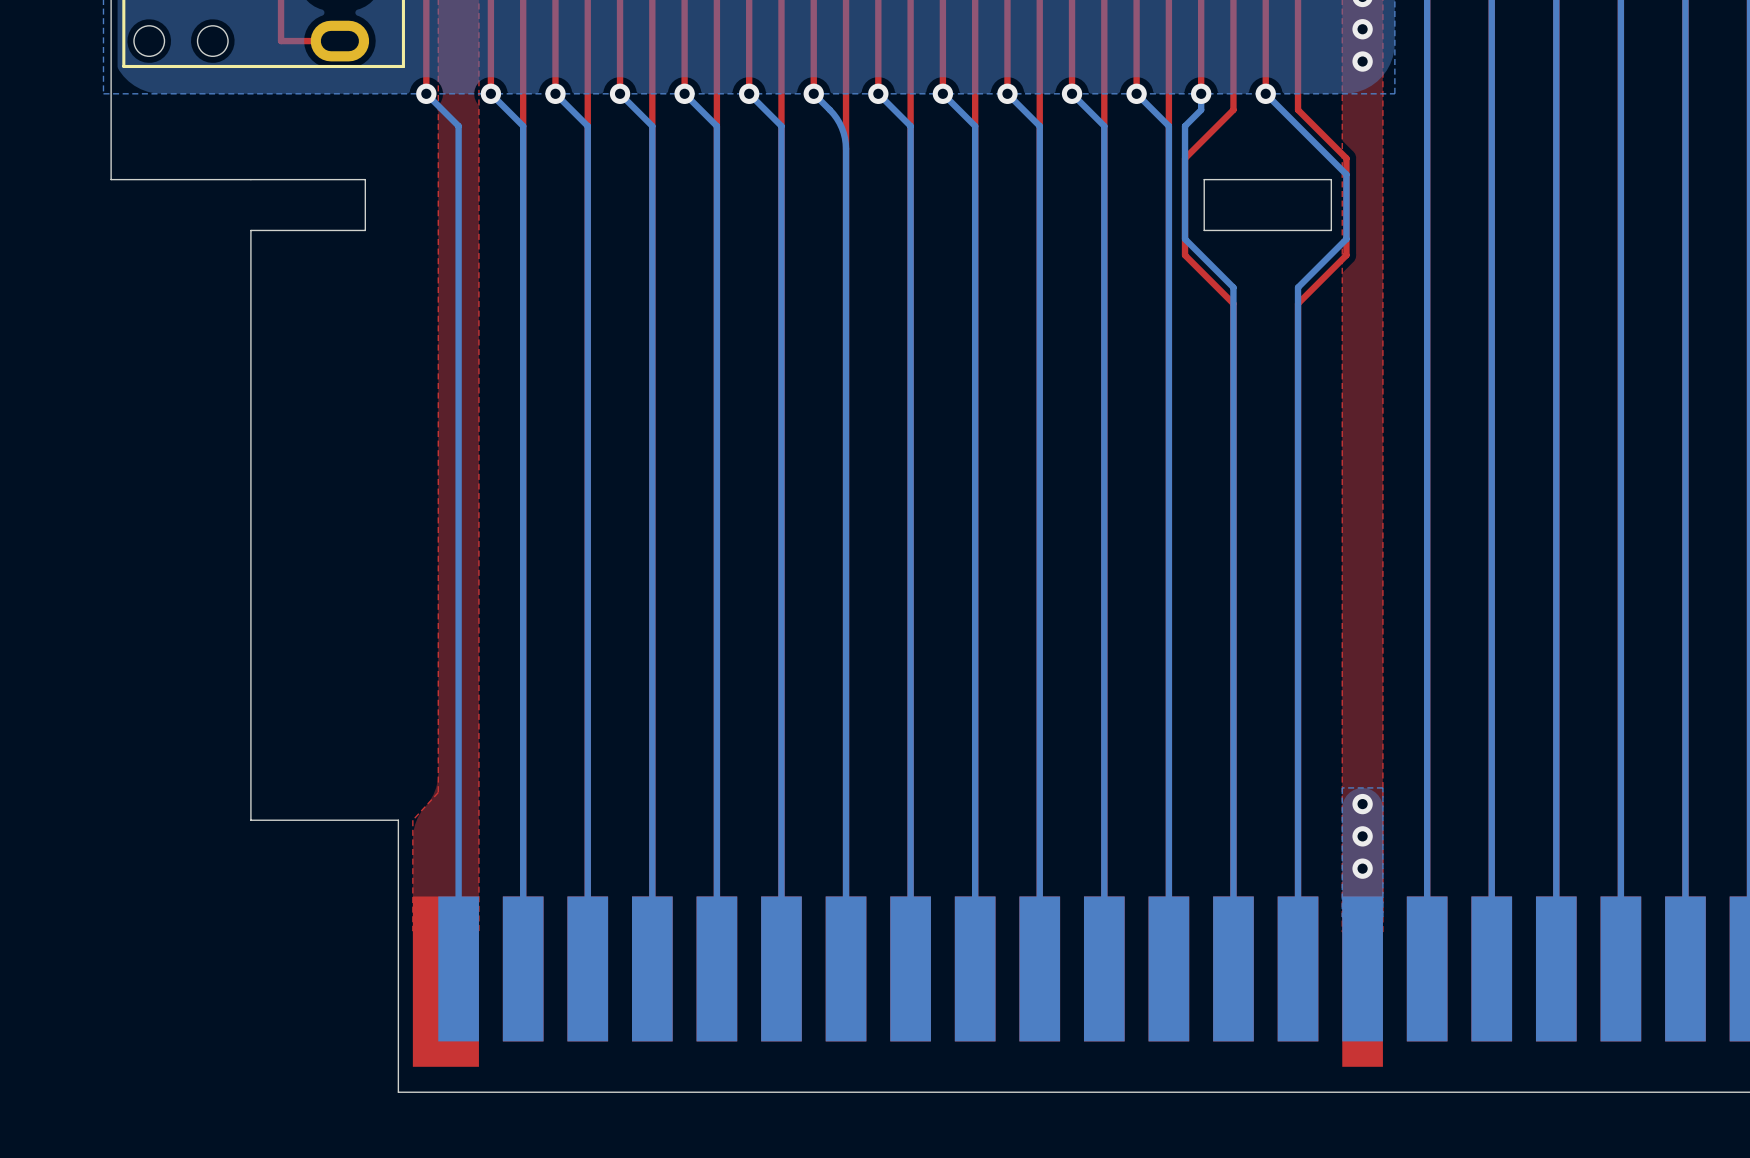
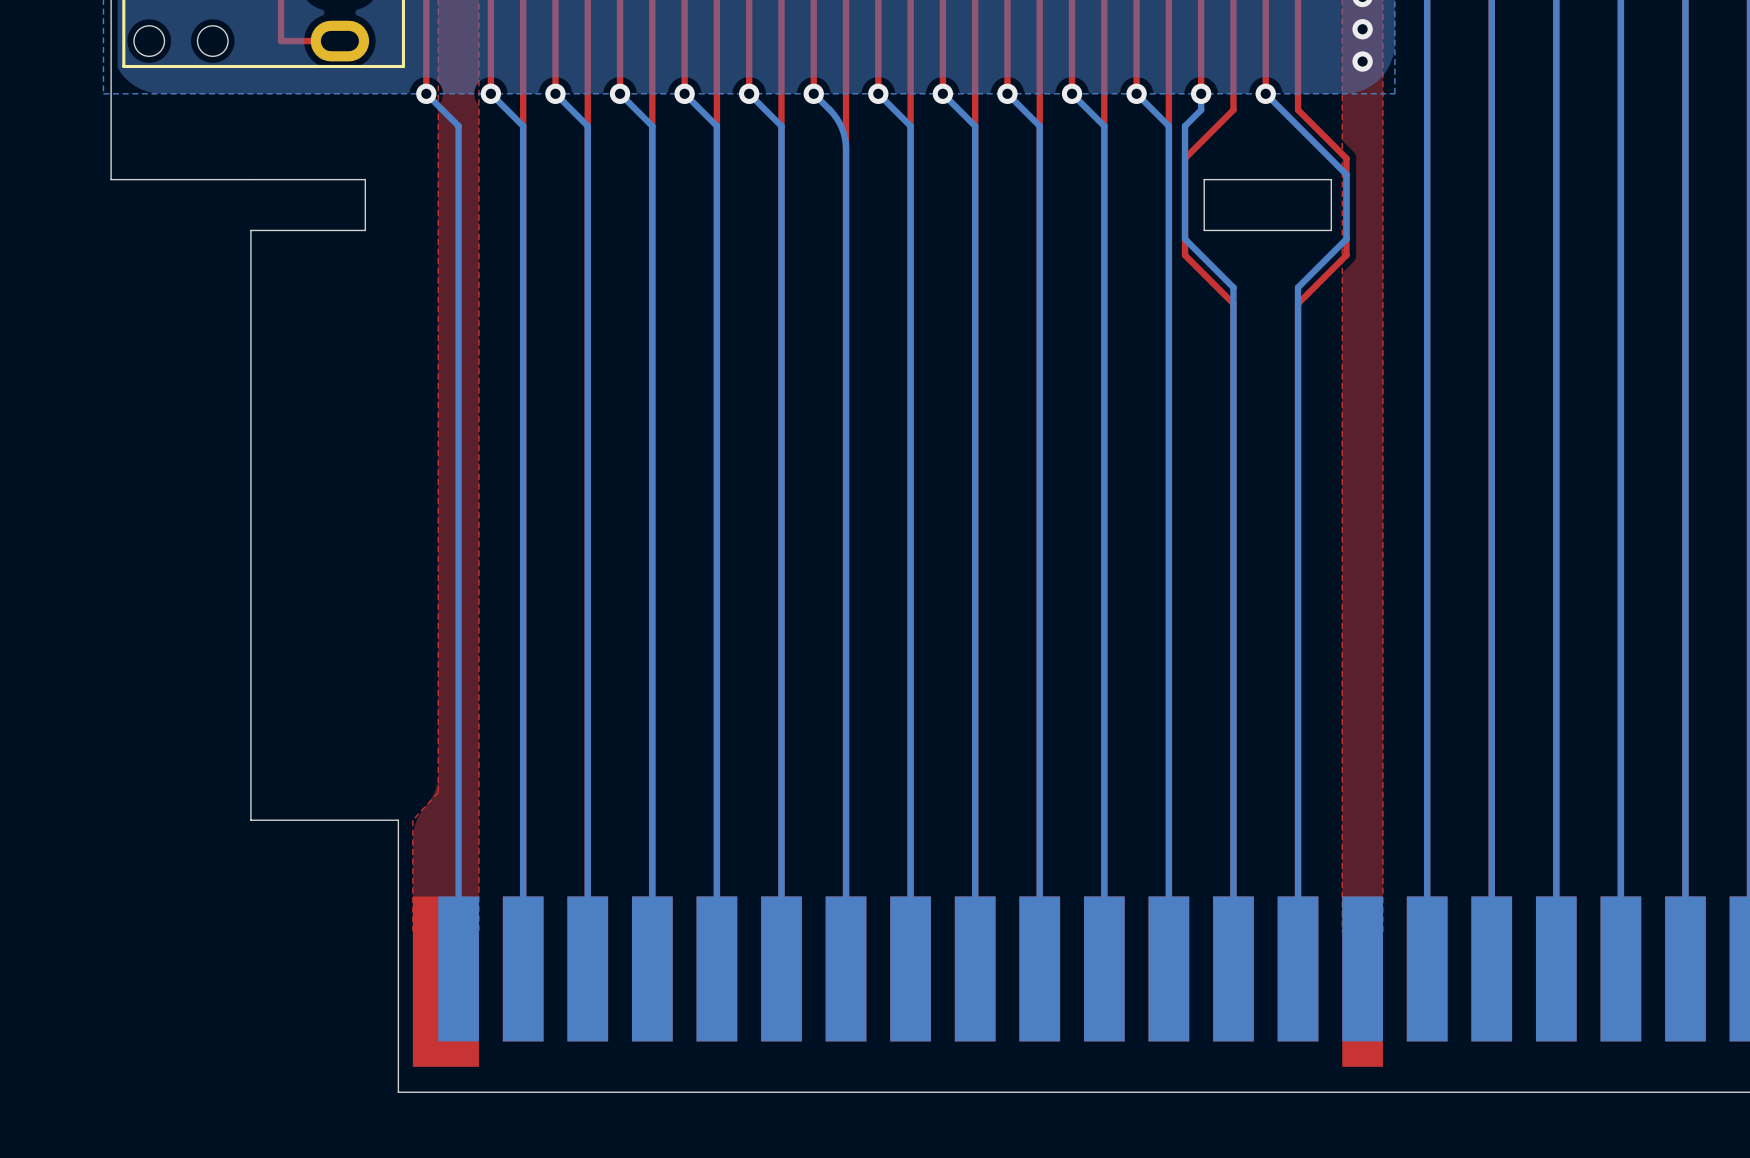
bottom zone outline: (1382, 787) (1382, 917) (1342, 917) (1342, 787) (1382, 787) -> none
via: (1362, 804) -> none
via: (1362, 836) -> none
via: (1362, 868) -> none

